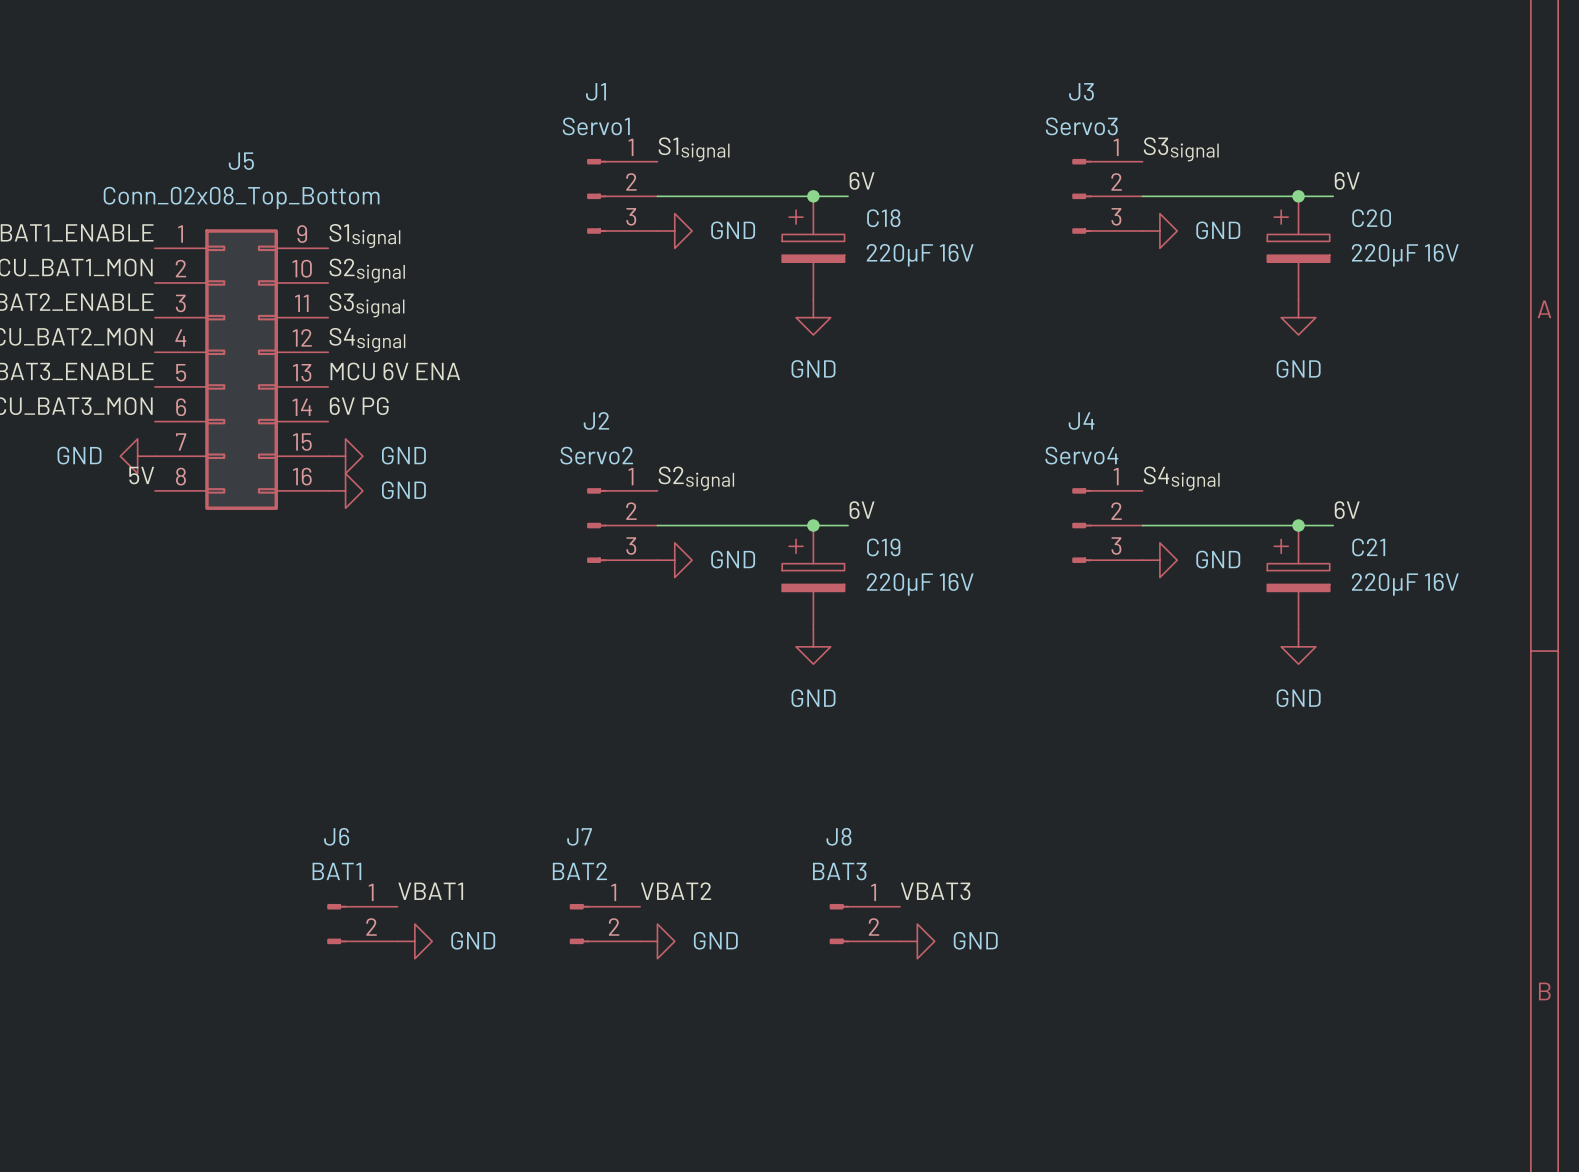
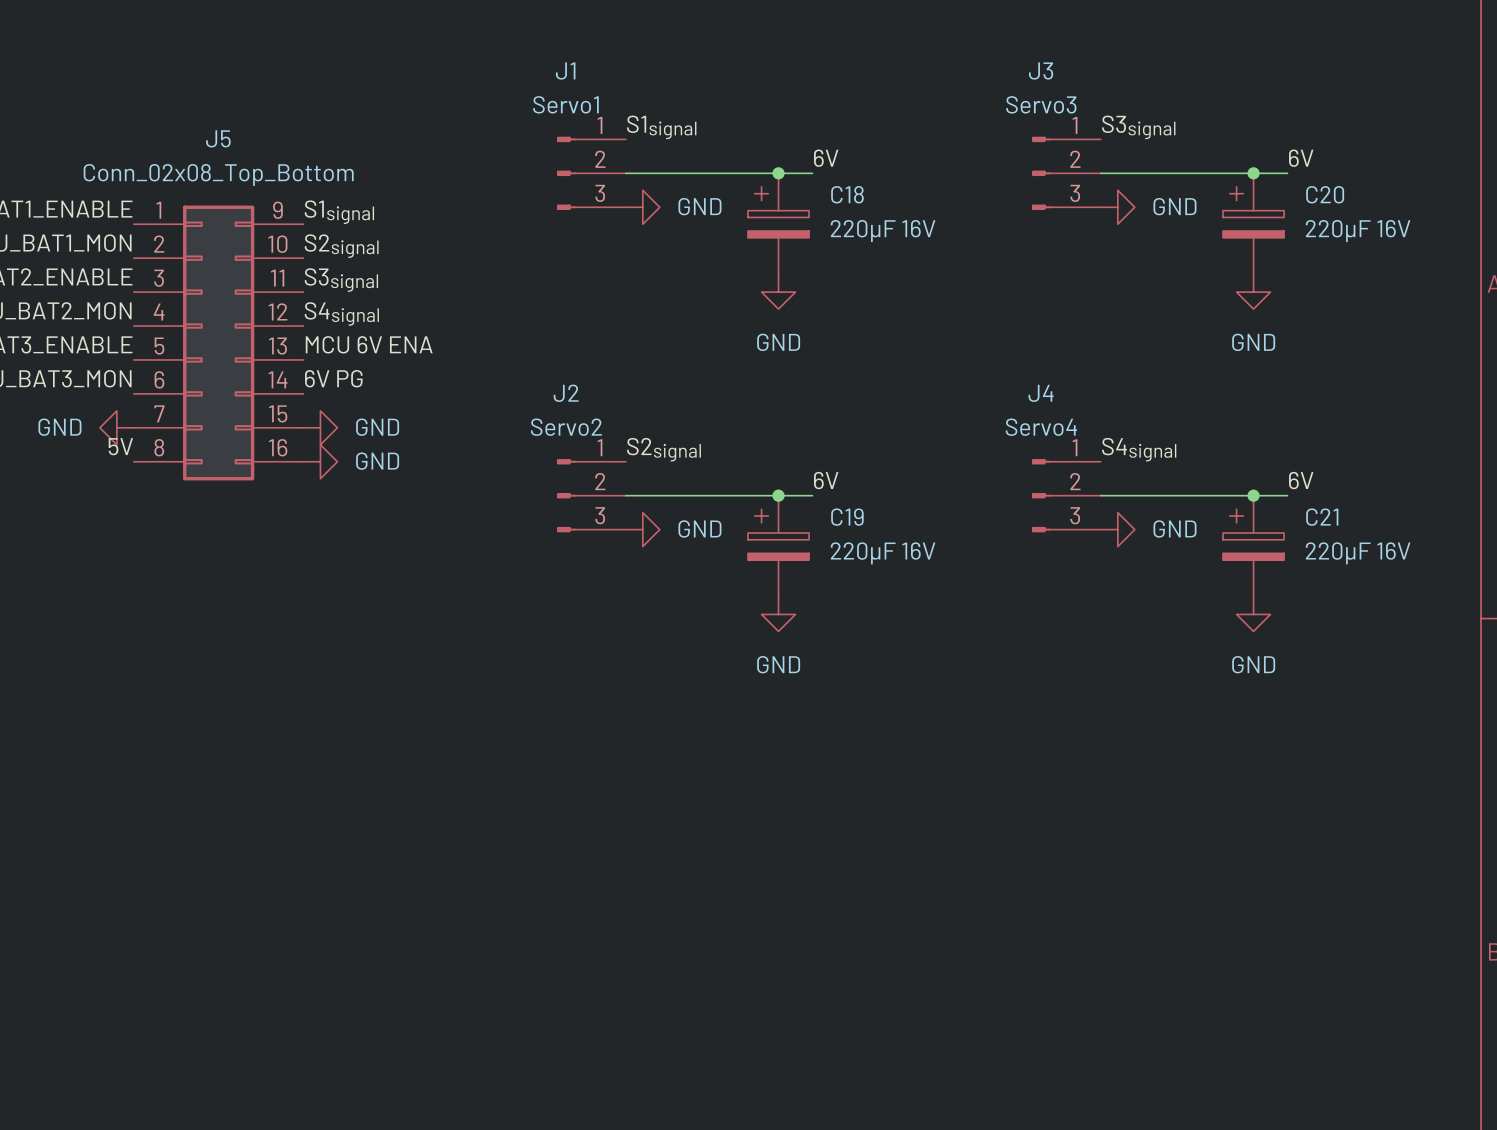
label: VBAT1 (430, 891) -> none
label: VBAT2 (676, 891) -> none
label: VBAT3 (935, 891) -> none
J6: BAT1 (362, 924) -> none
J7: BAT2 (604, 924) -> none
J8: BAT3 (864, 924) -> none
power symbol: GND (414, 941) -> none
power symbol: GND (657, 941) -> none
power symbol: GND (917, 941) -> none

